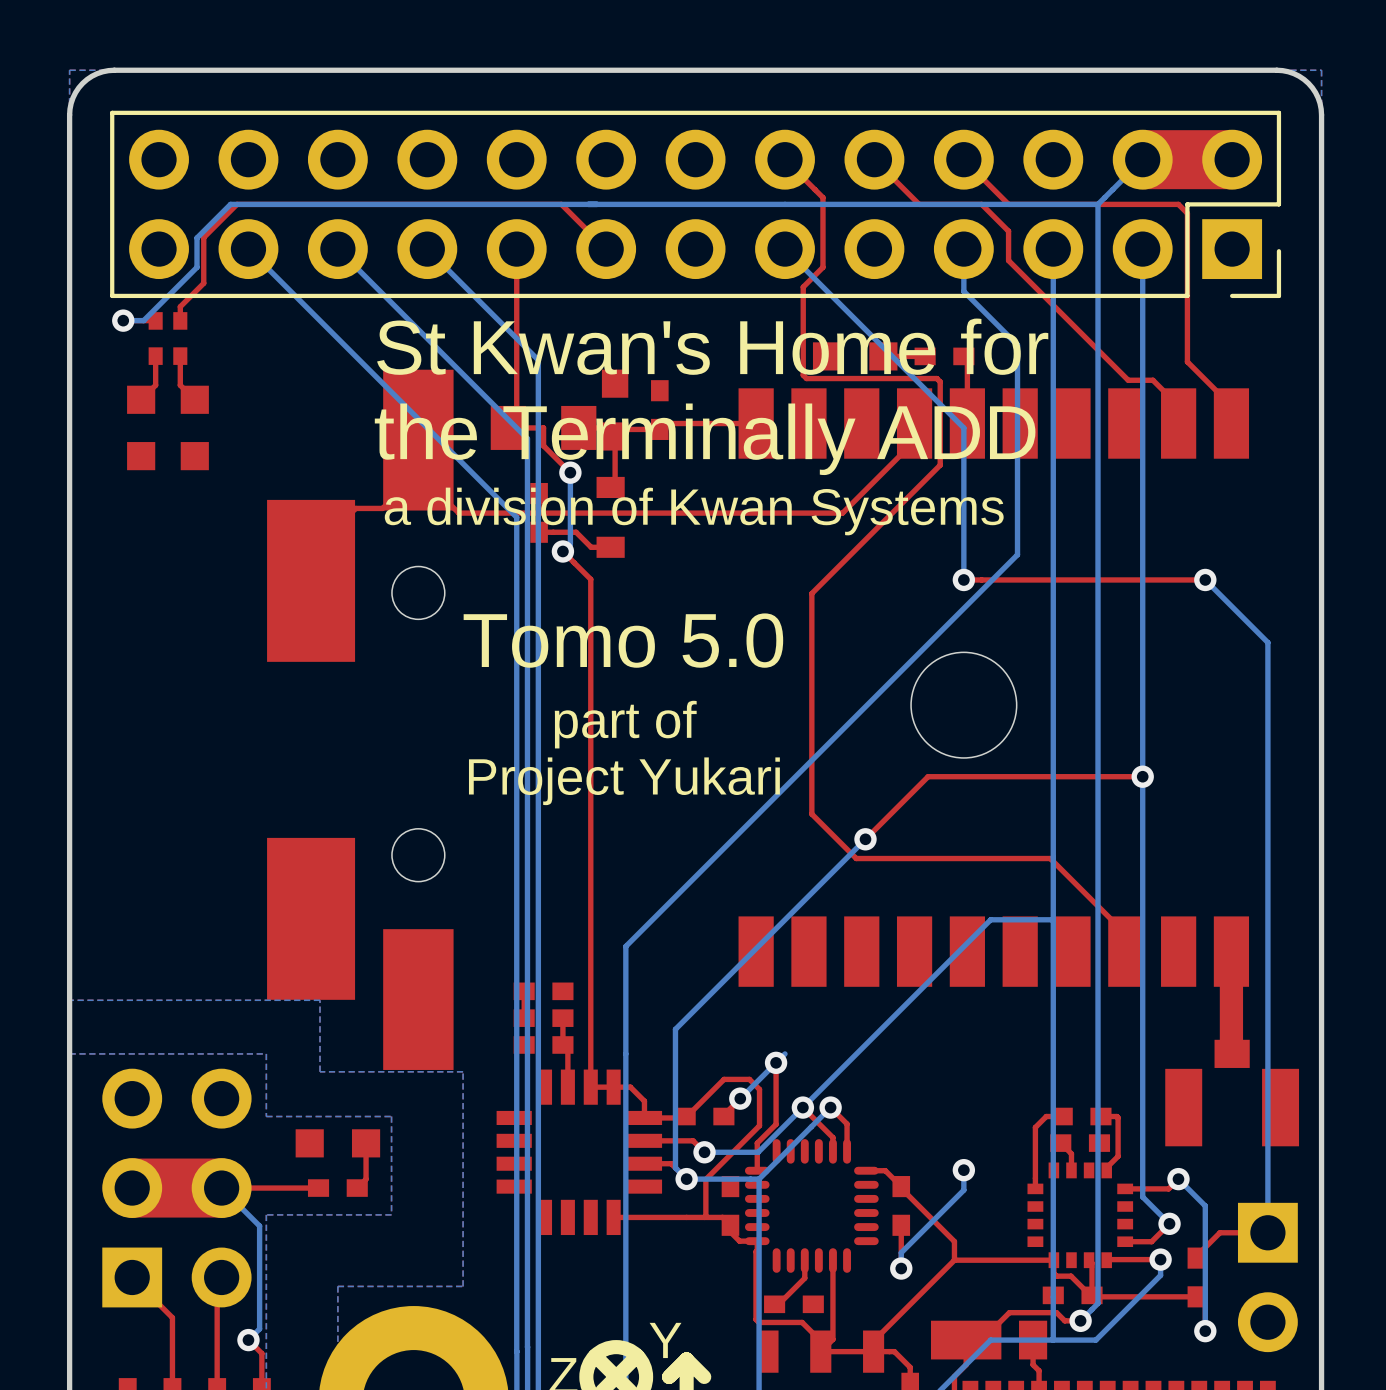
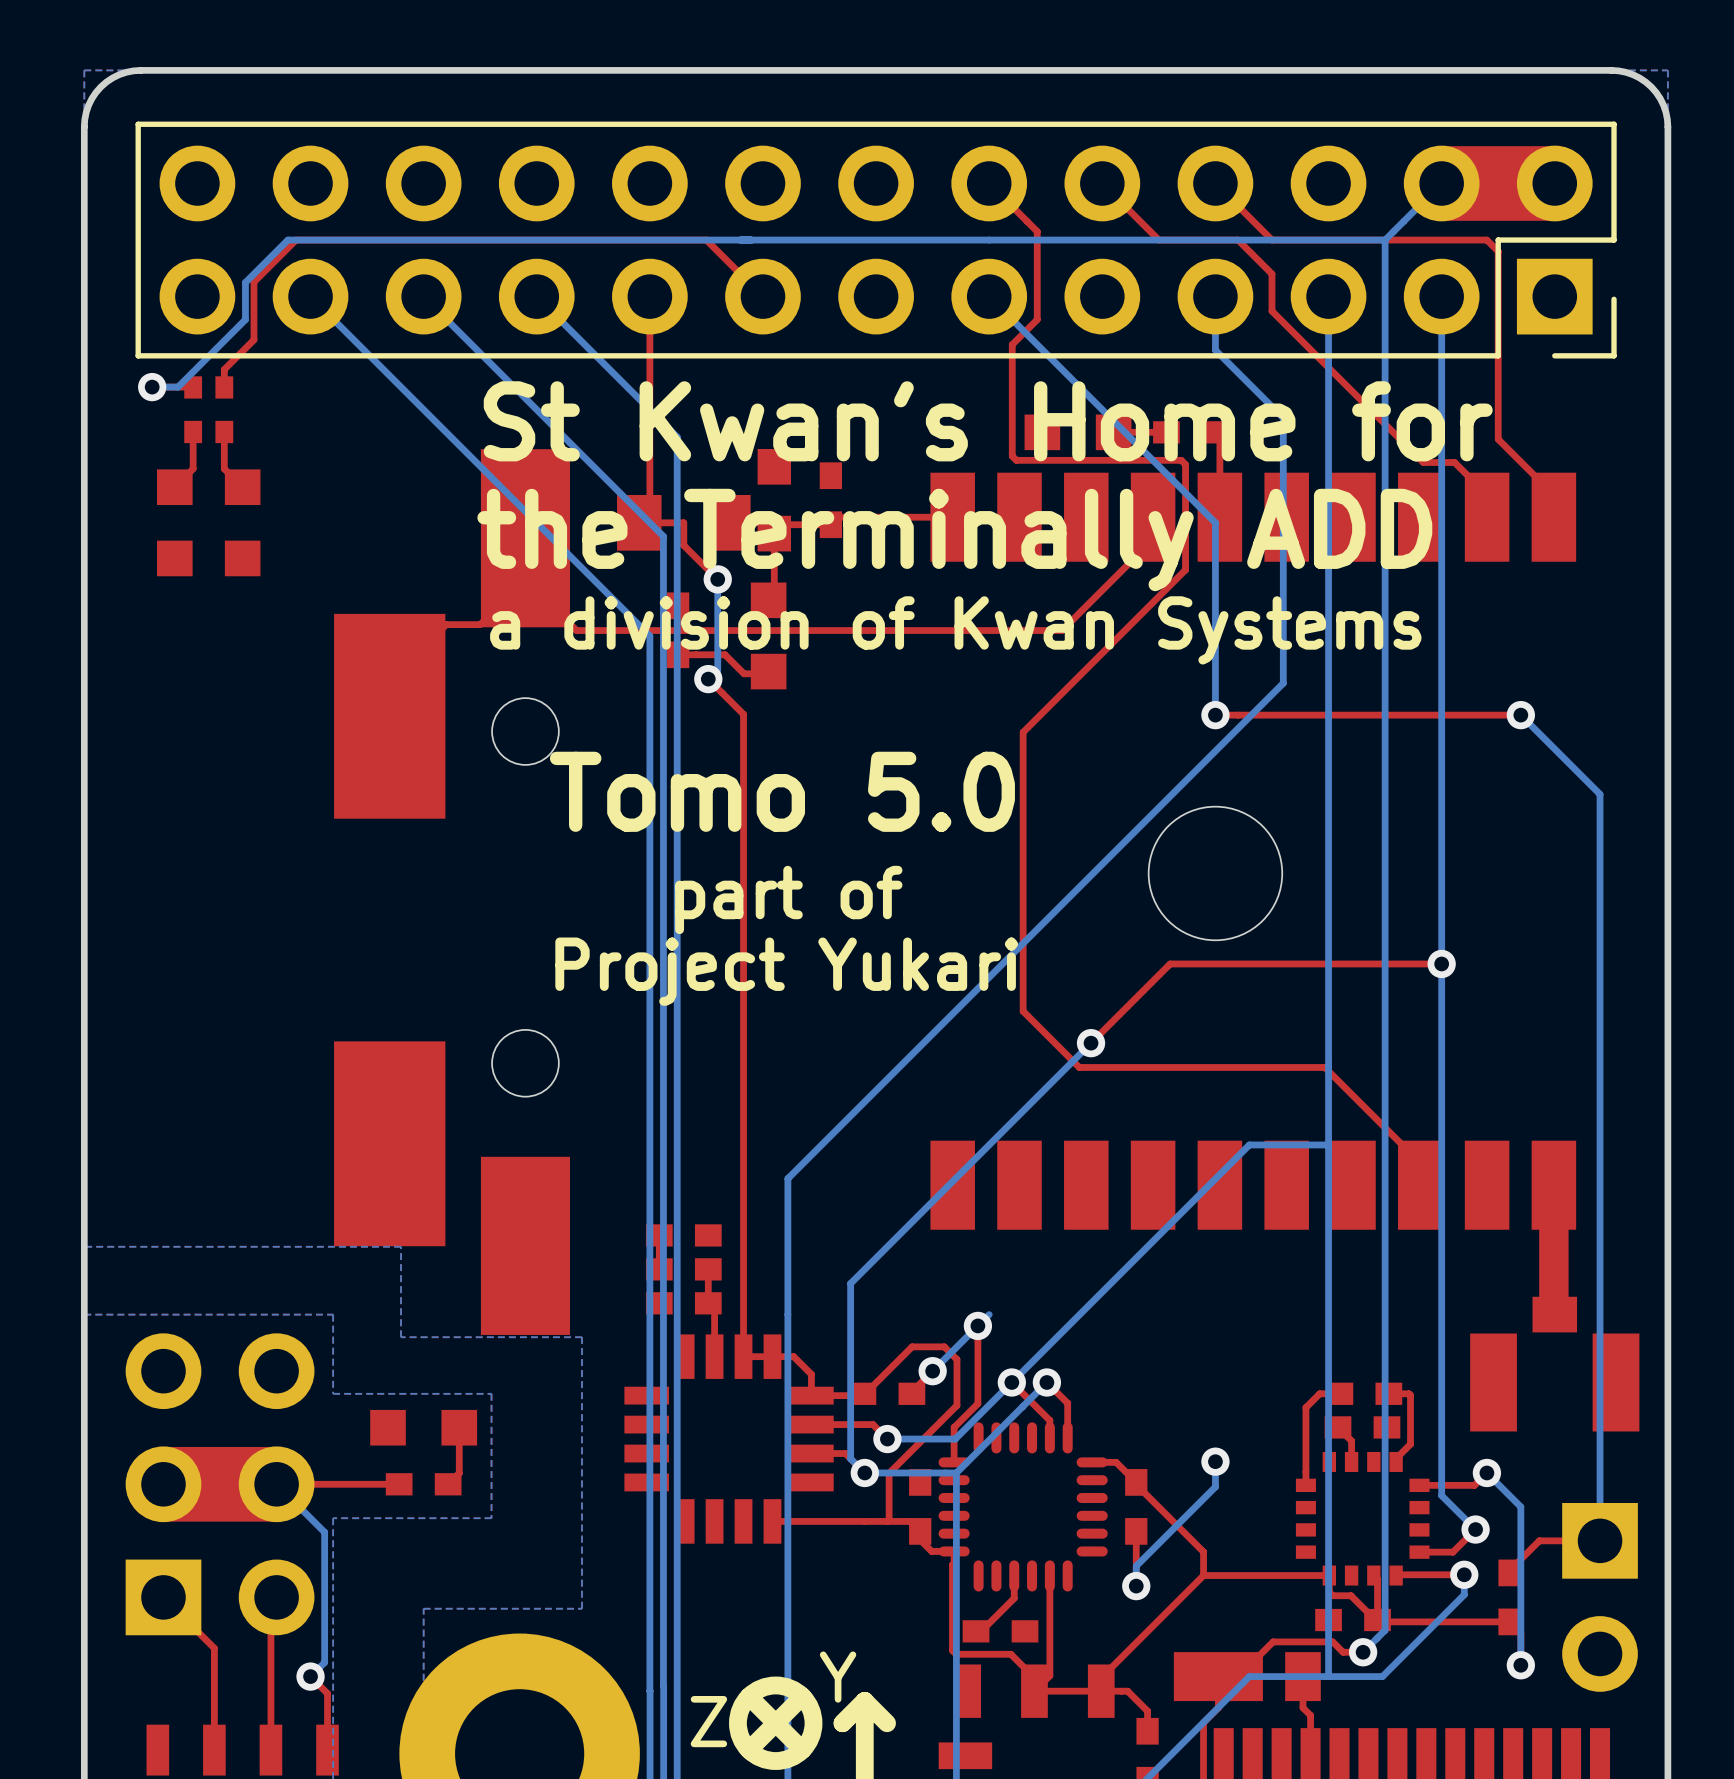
part footprint: [596, 476, 625, 558] -> [750, 582, 787, 690]

